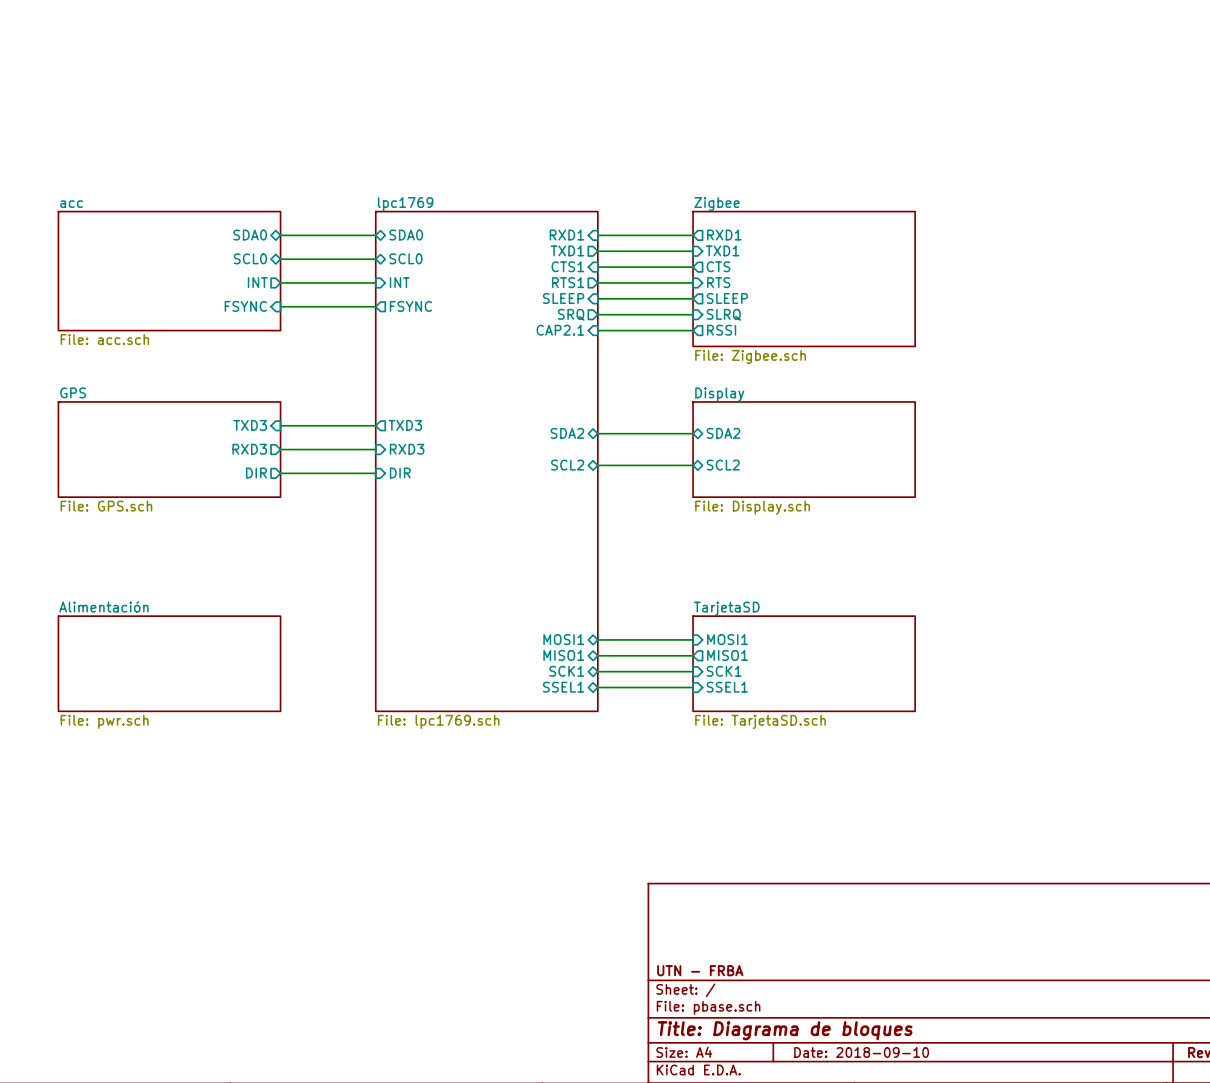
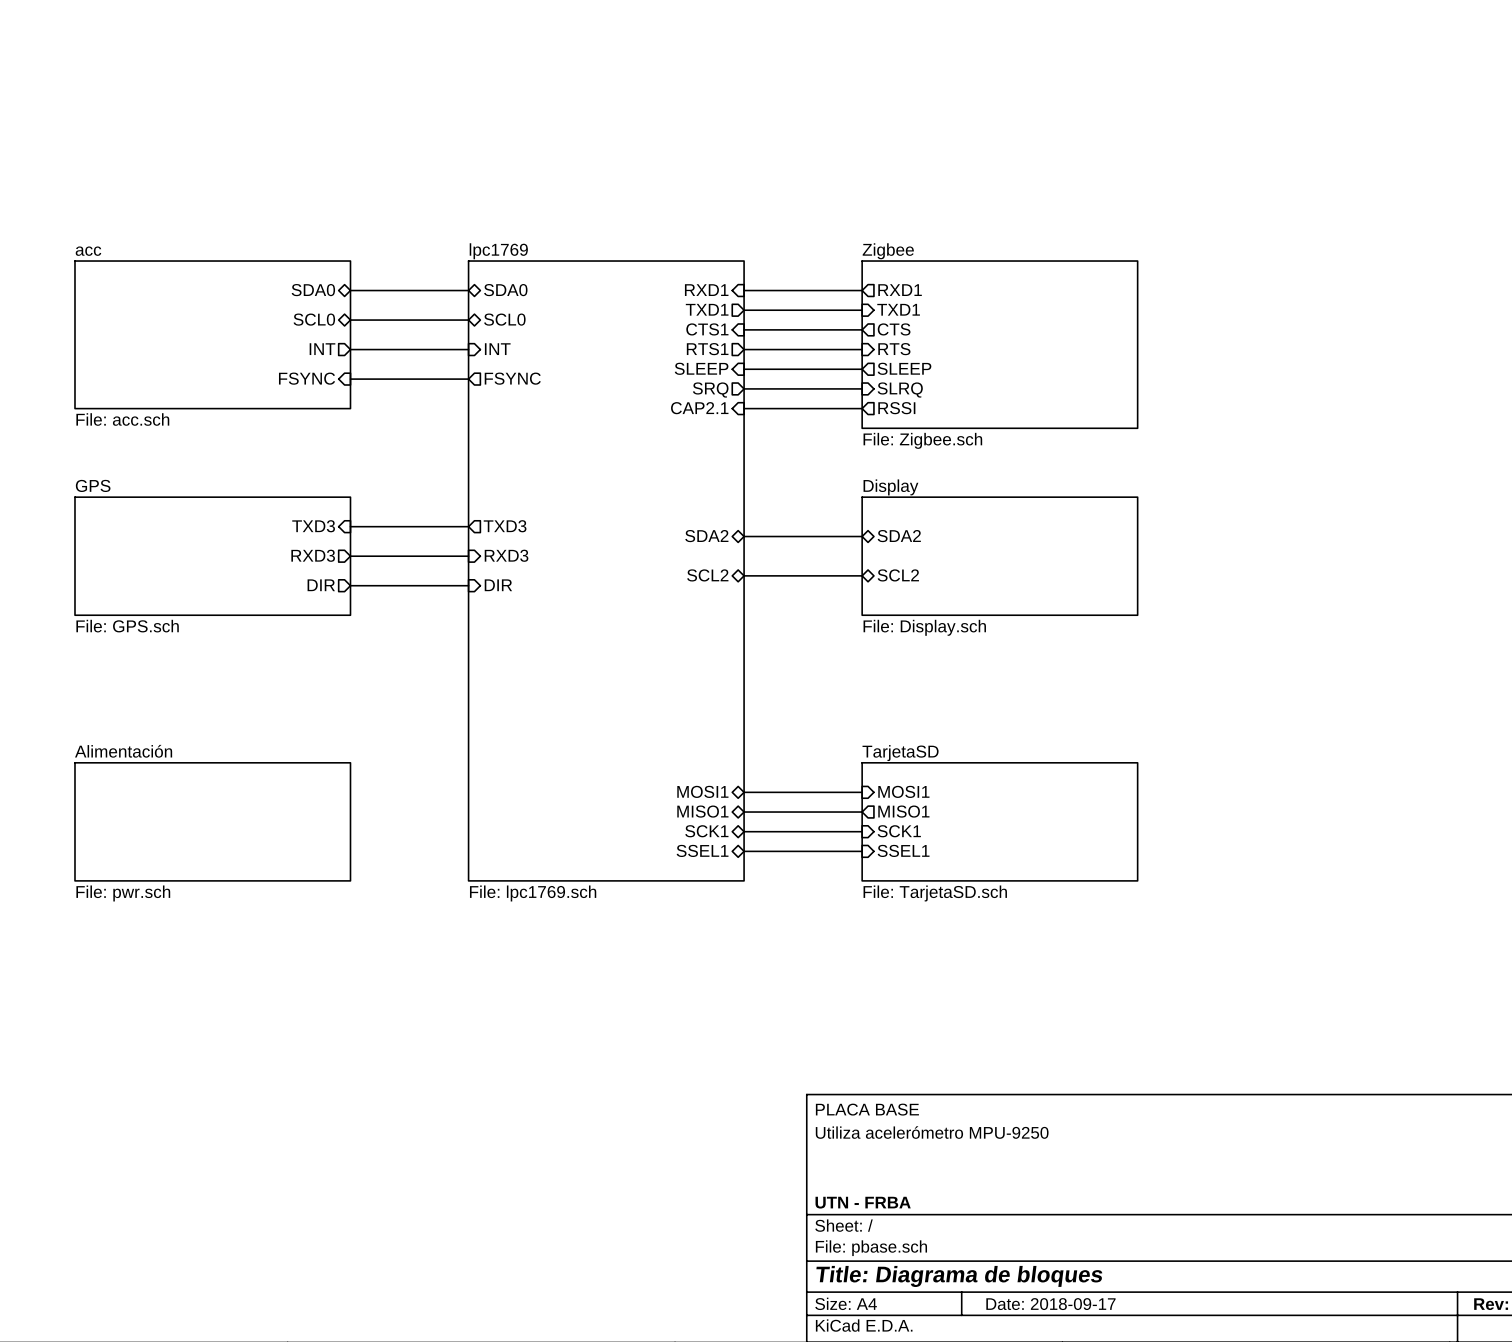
title block: none -> PLACA BASE (867, 1109)
title block: none -> Utiliza acelerómetro MPU-9250 (932, 1132)
title block: Date: 2018-09-10 (861, 1052) -> Date: 2018-09-17 (1050, 1304)

